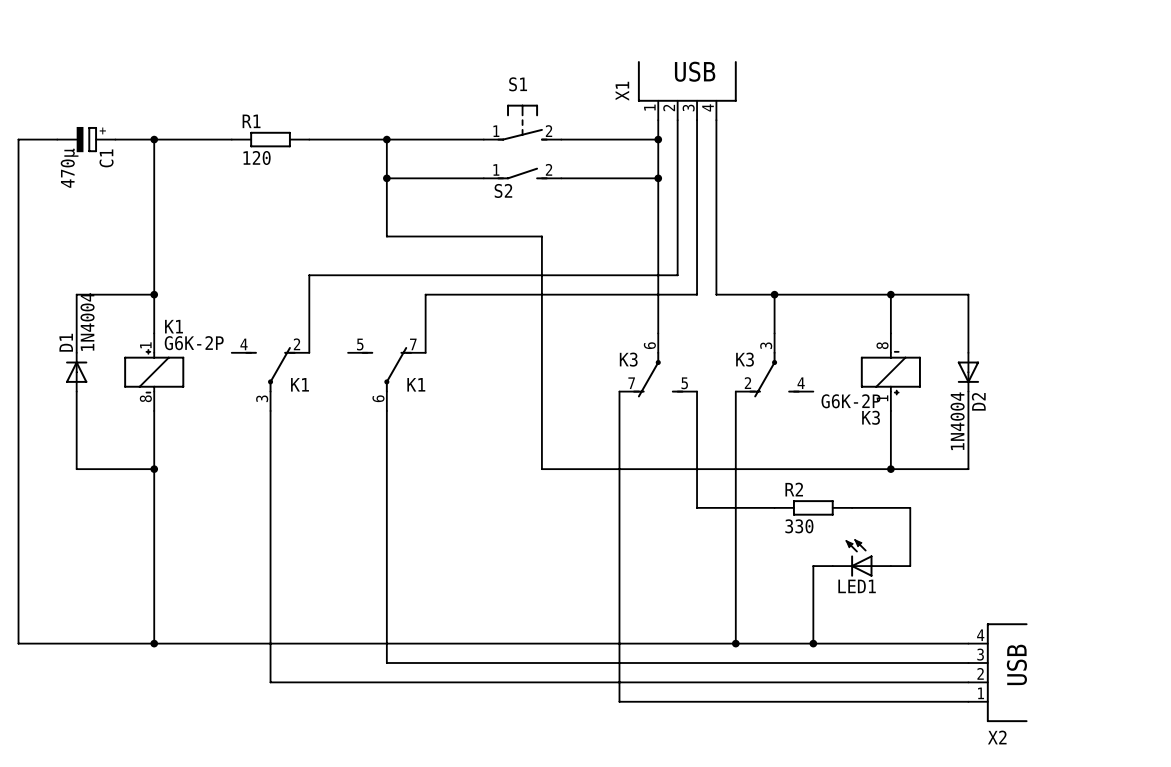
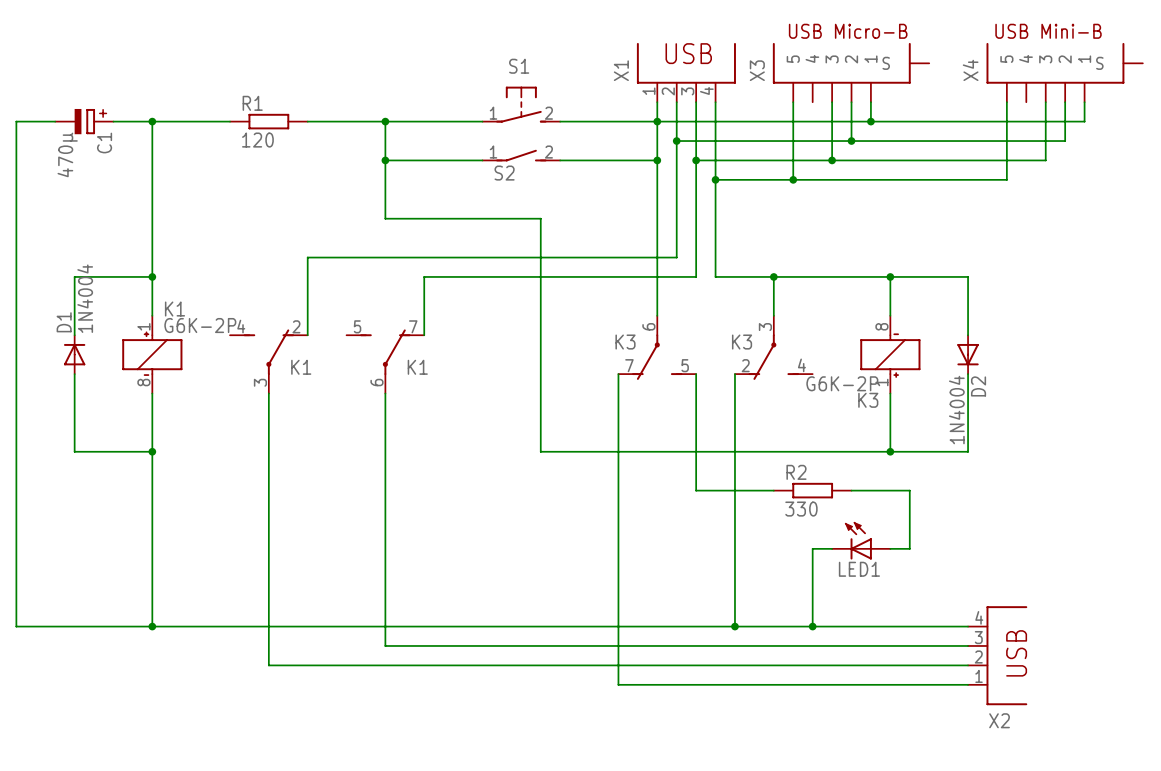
X3: none -> (851, 72)
X4: none -> (1064, 72)
wire: none -> (793, 102) (793, 179)
wire: none -> (832, 102) (832, 160)
wire: none -> (851, 102) (851, 141)
wire: none -> (870, 102) (870, 121)
wire: none -> (1006, 102) (1006, 179) (715, 179)
wire: none -> (1045, 102) (1045, 160) (696, 160)
wire: none -> (1065, 102) (1065, 141) (676, 141)
wire: none -> (1084, 102) (1084, 121) (657, 121)
junction: none -> (870, 121)
junction: none -> (676, 141)
junction: none -> (851, 141)
junction: none -> (696, 160)
junction: none -> (832, 160)
junction: none -> (715, 179)
junction: none -> (793, 179)

